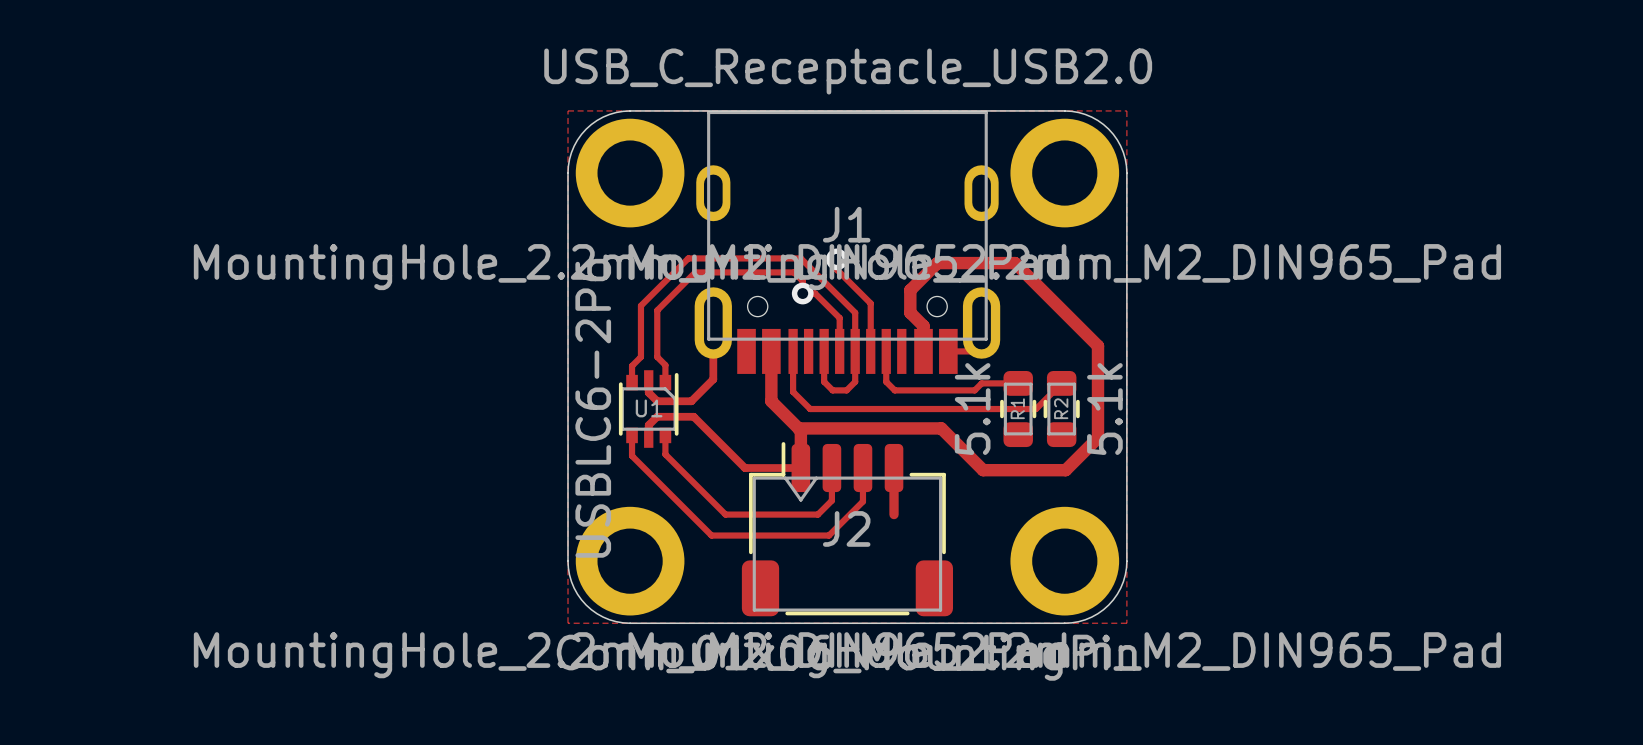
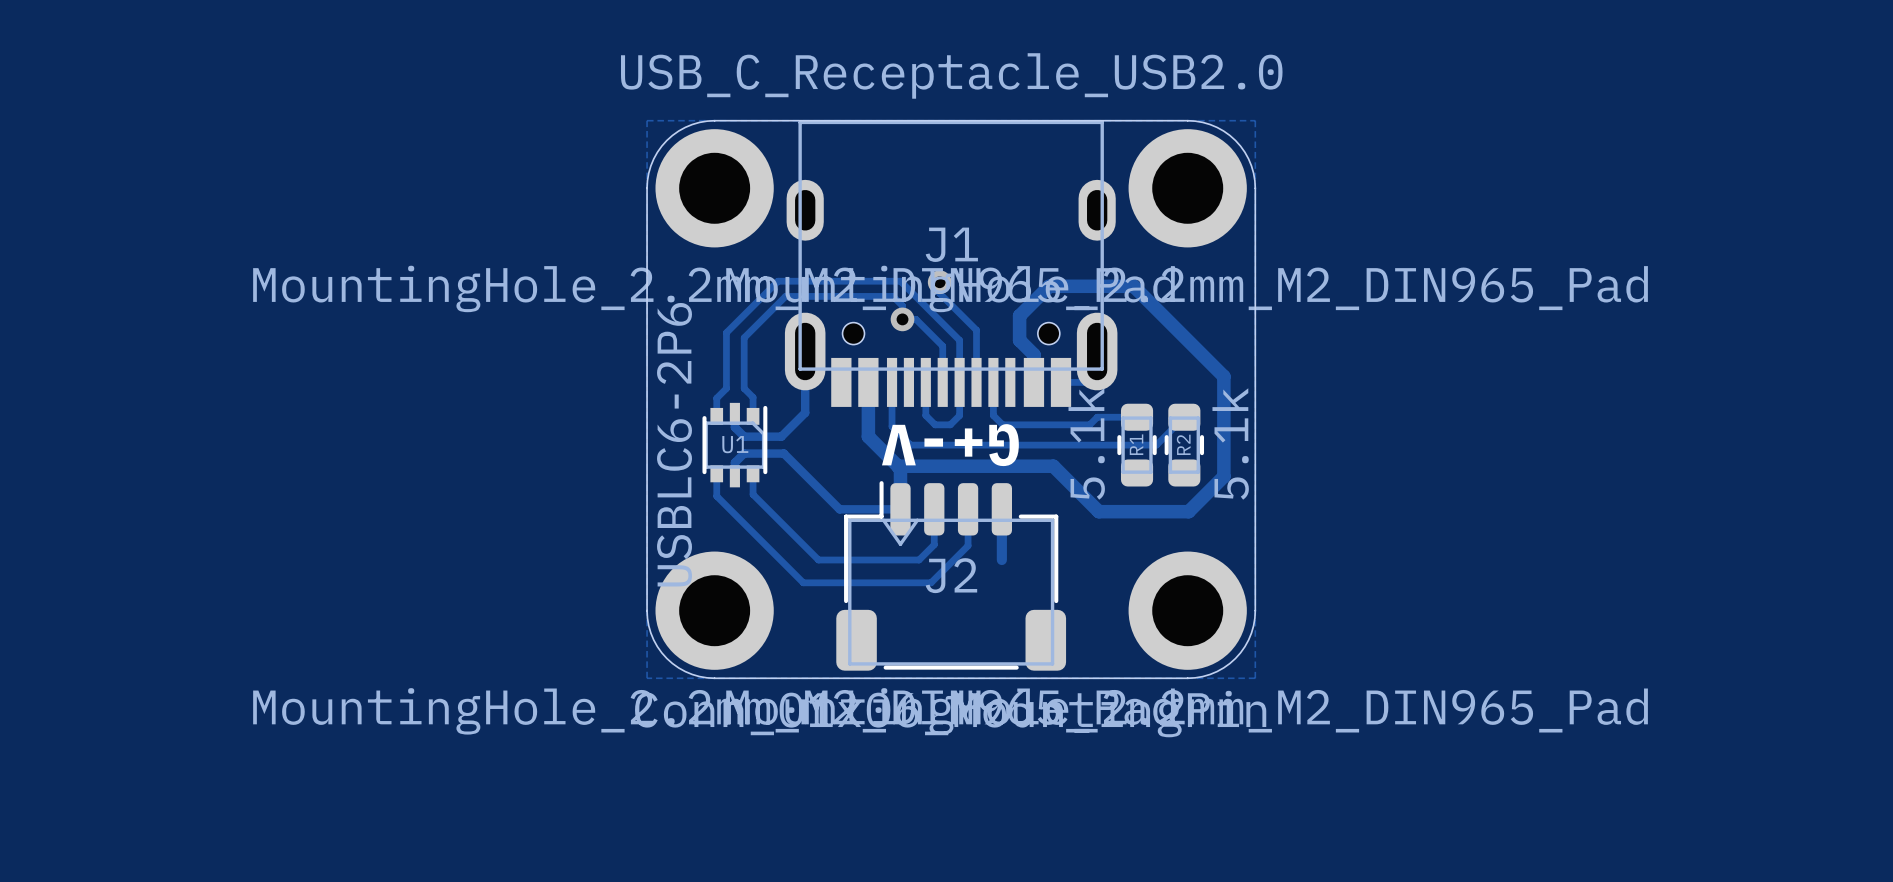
text: none -> G+-V (950, 445)

